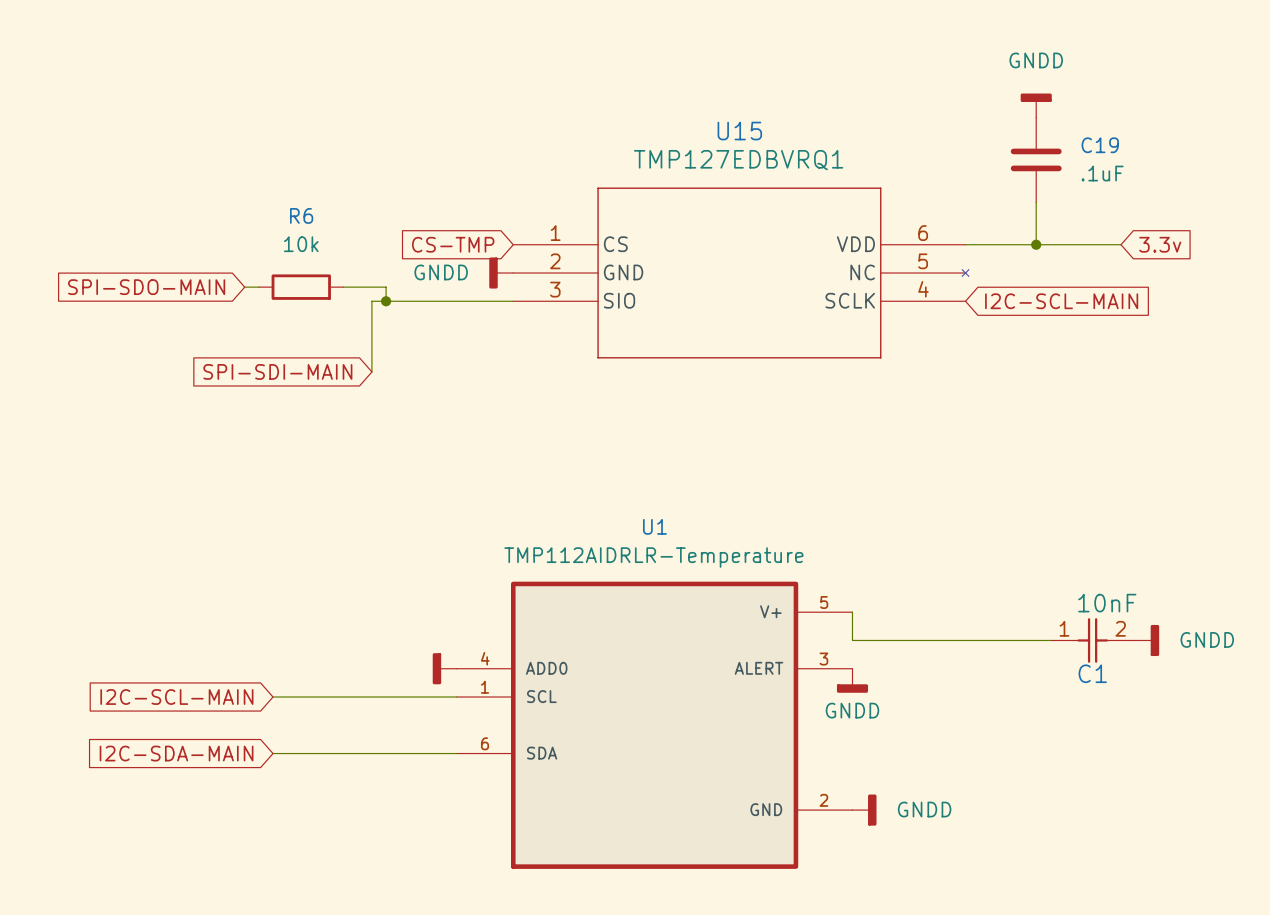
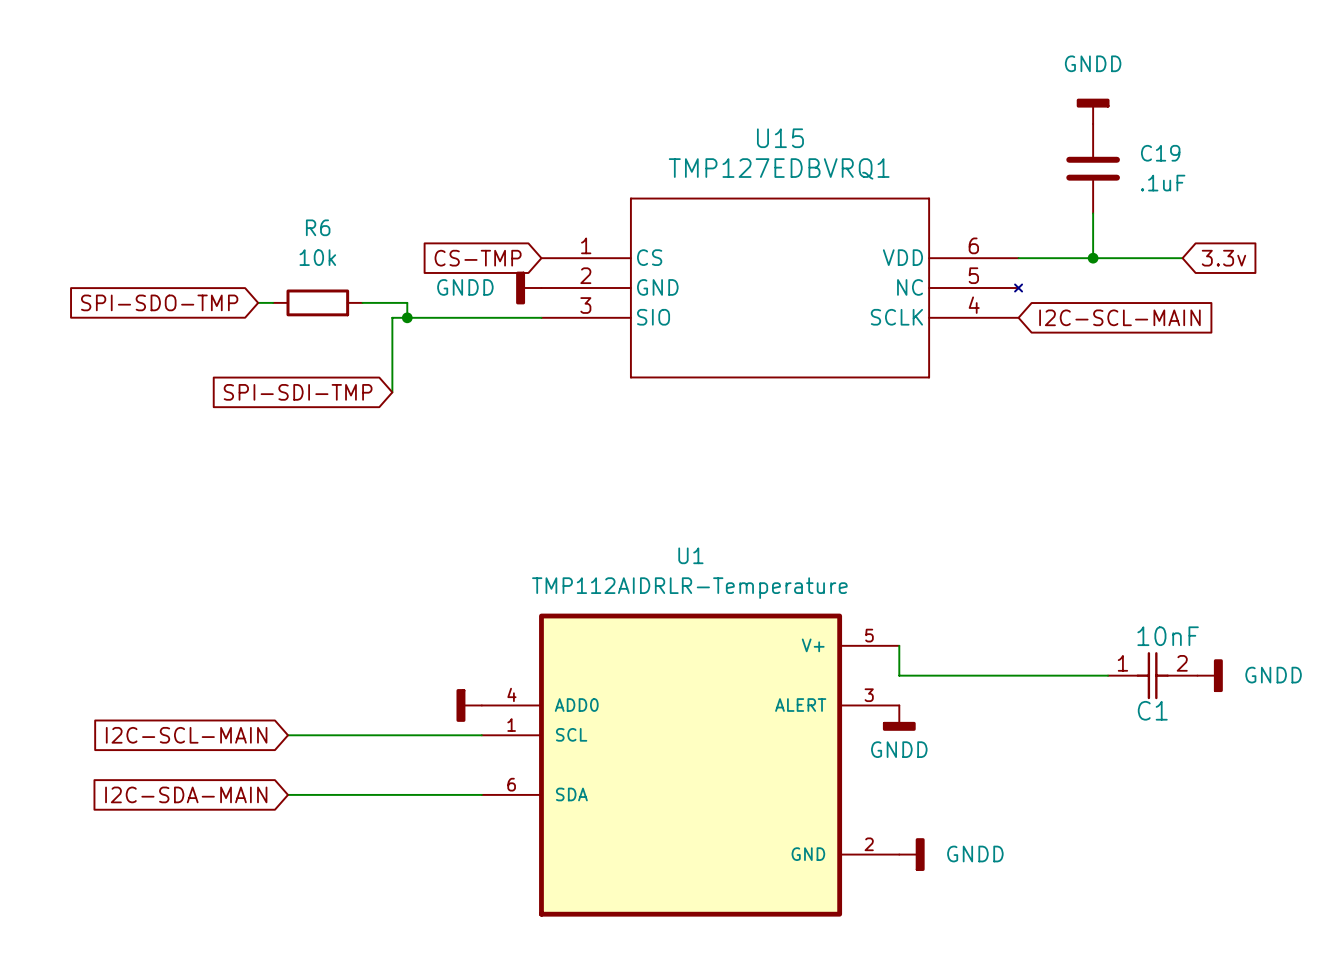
global label: SPI-SDO-MAIN (146, 287) -> SPI-SDO-TMP (159, 302)
global label: SPI-SDI-MAIN (277, 371) -> SPI-SDI-TMP (298, 392)

